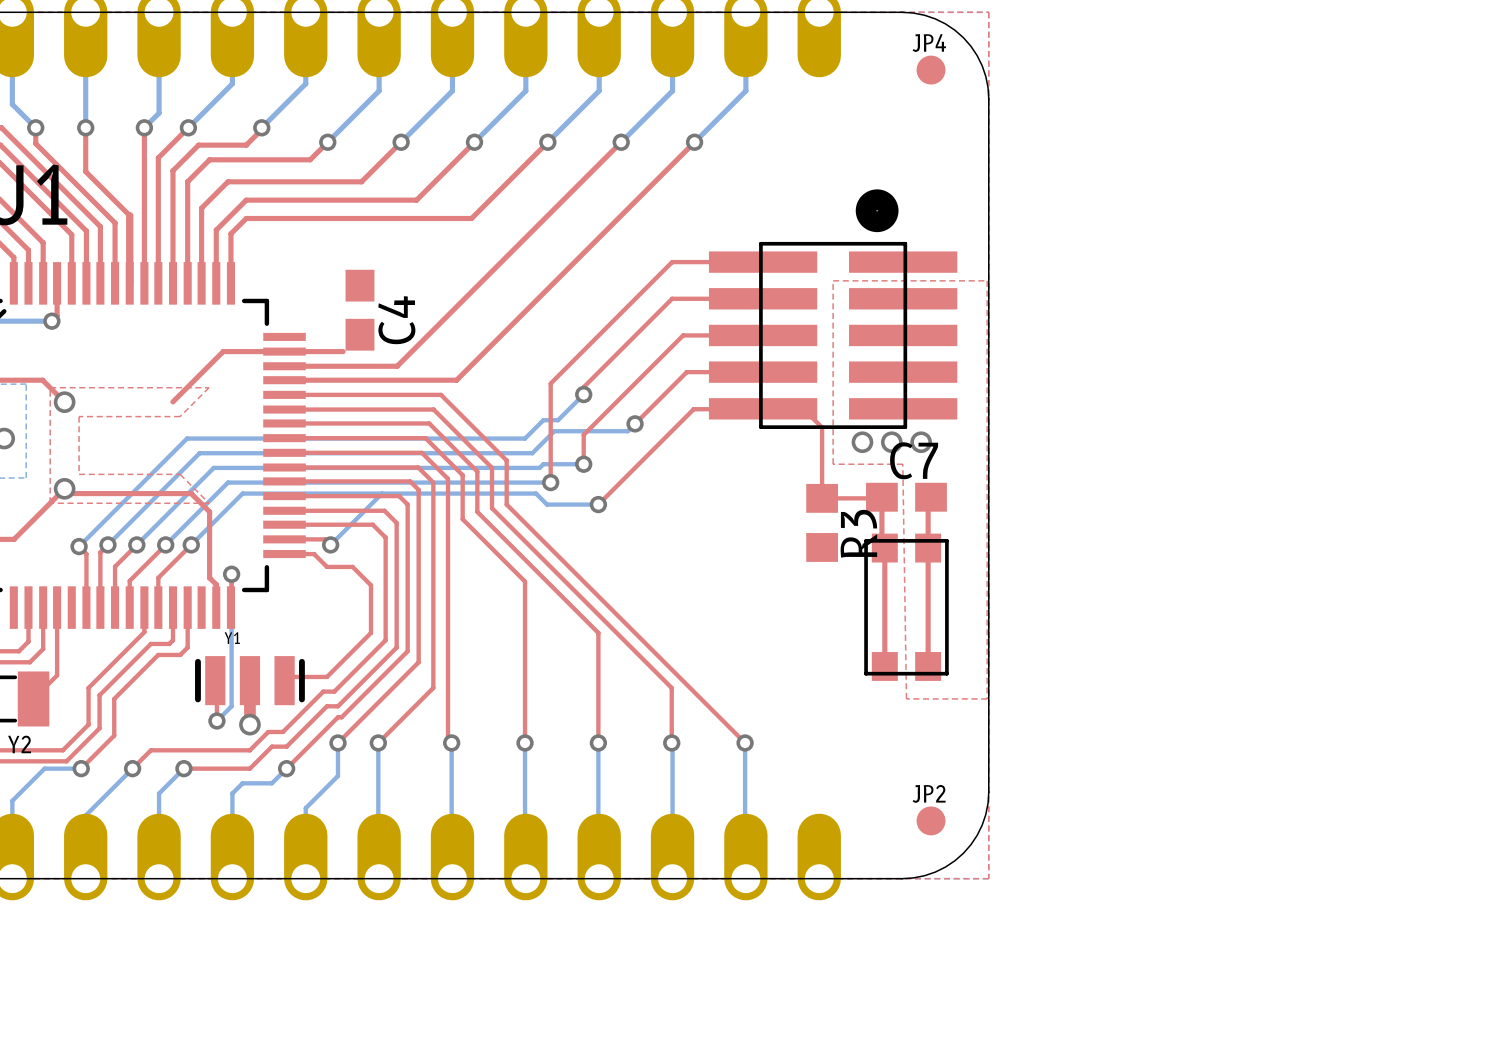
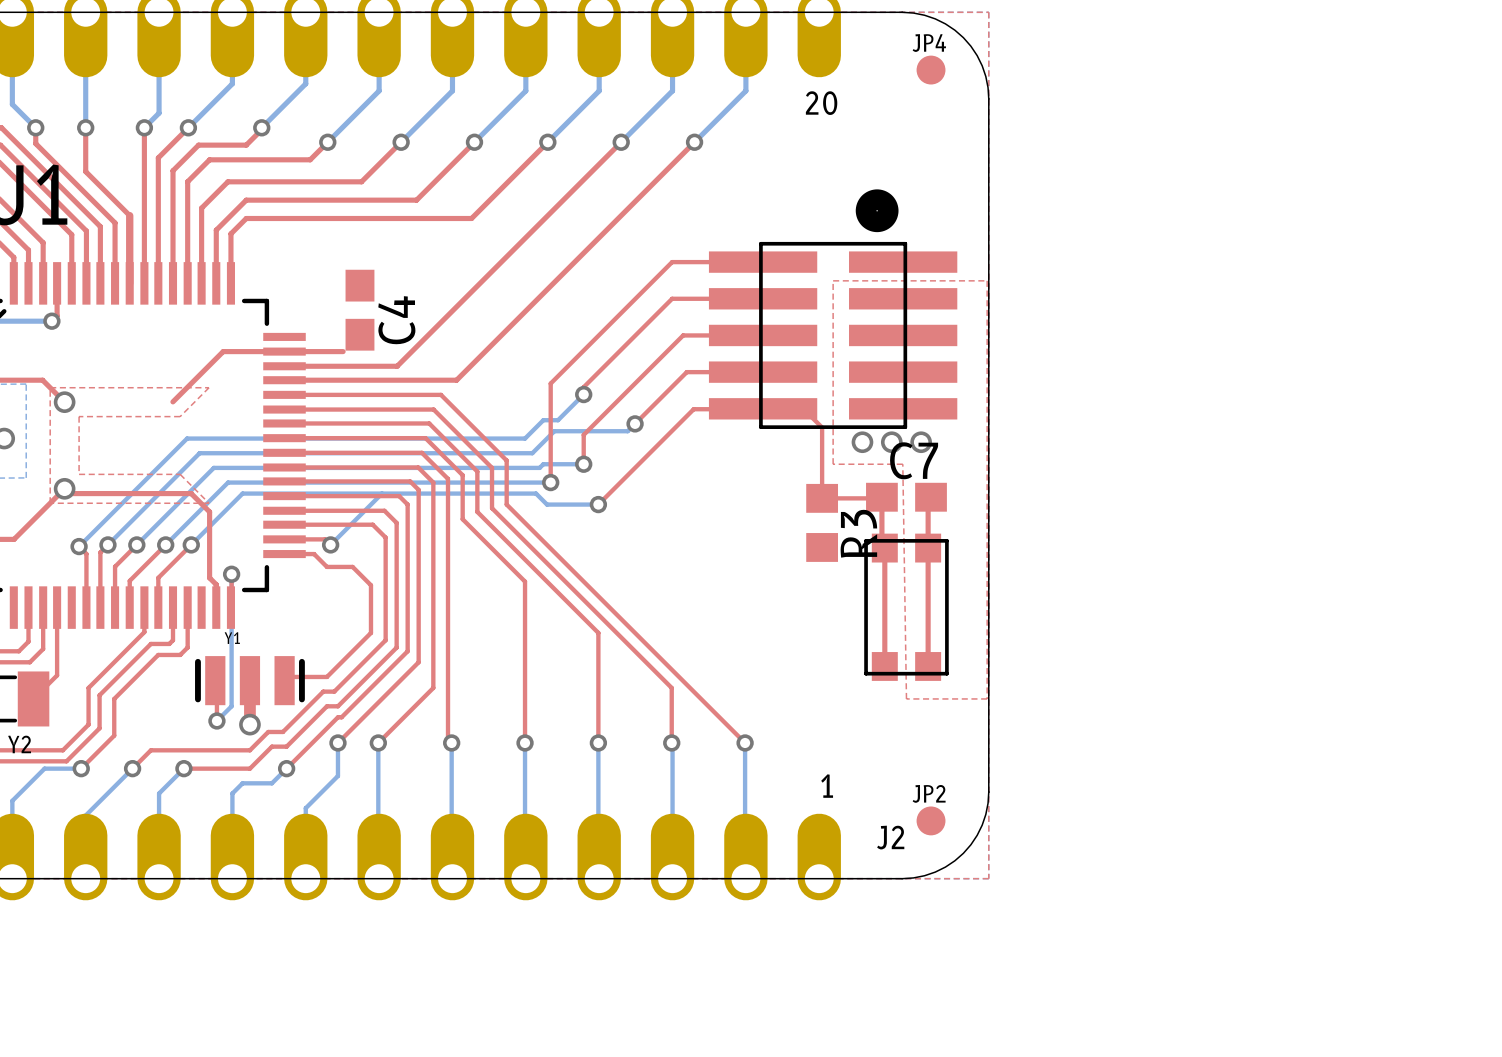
text: none -> 20 (821, 103)
text: none -> 1 (827, 786)
text: none -> J2 (890, 837)

